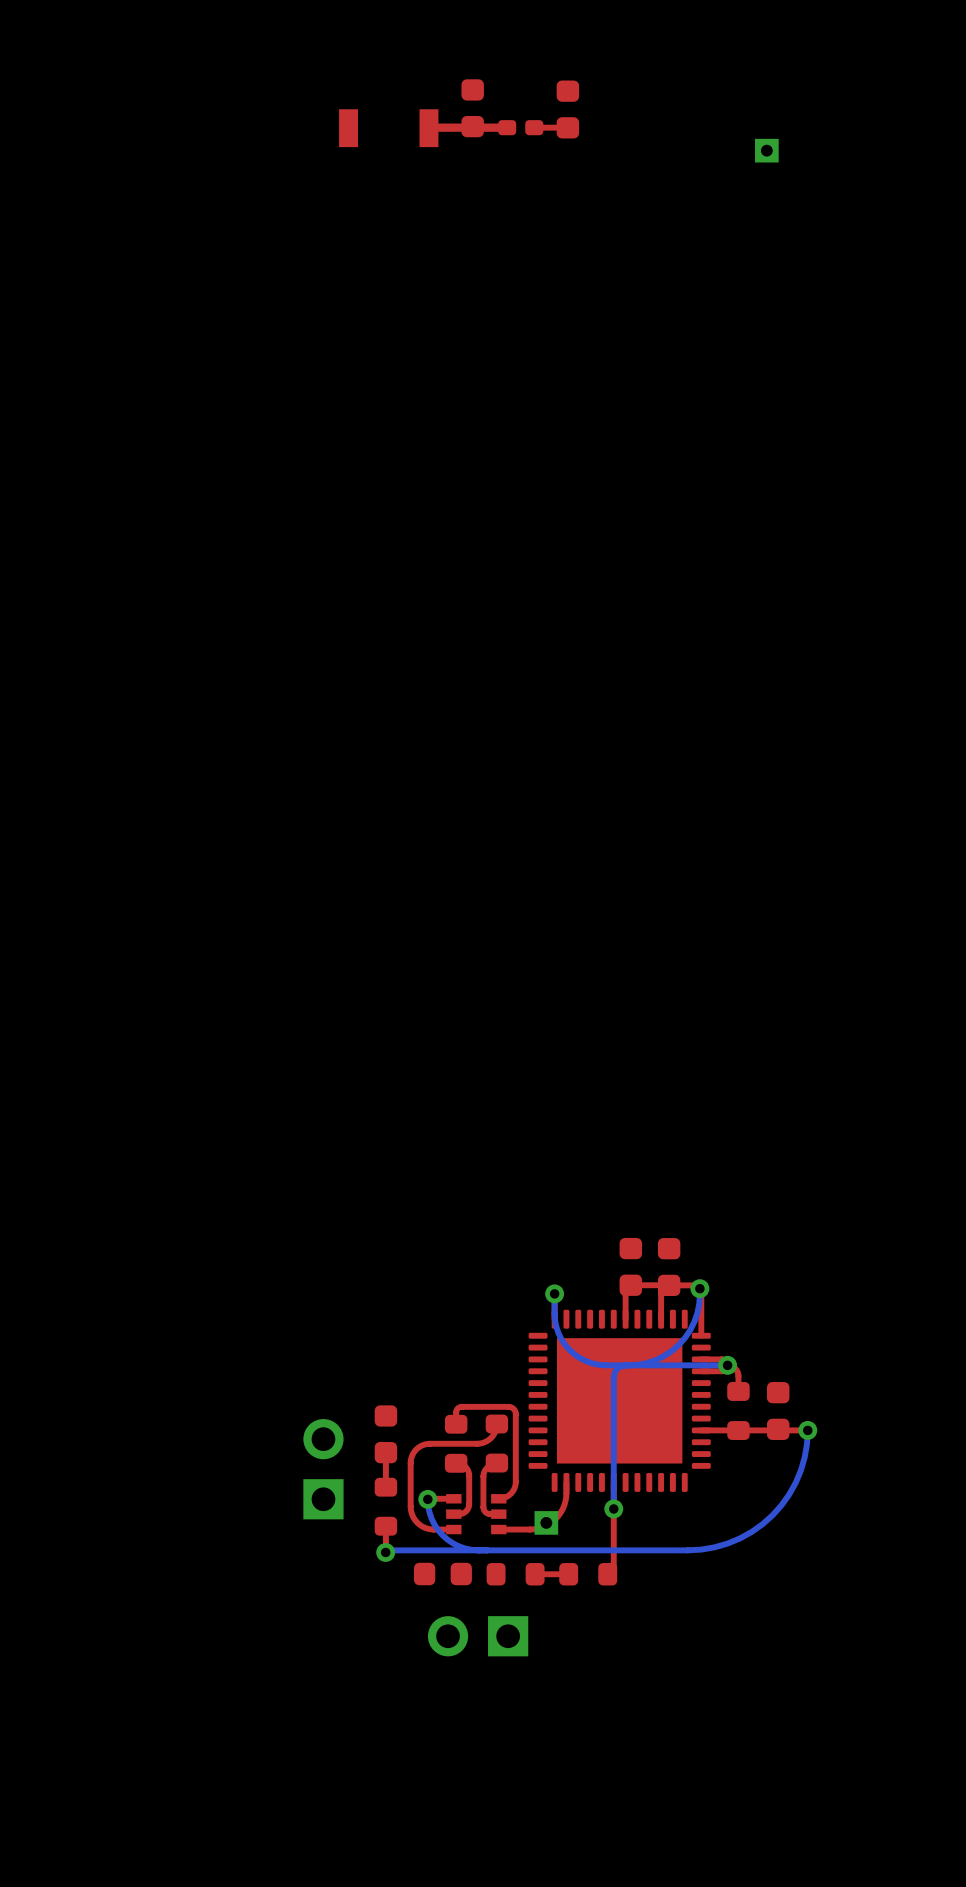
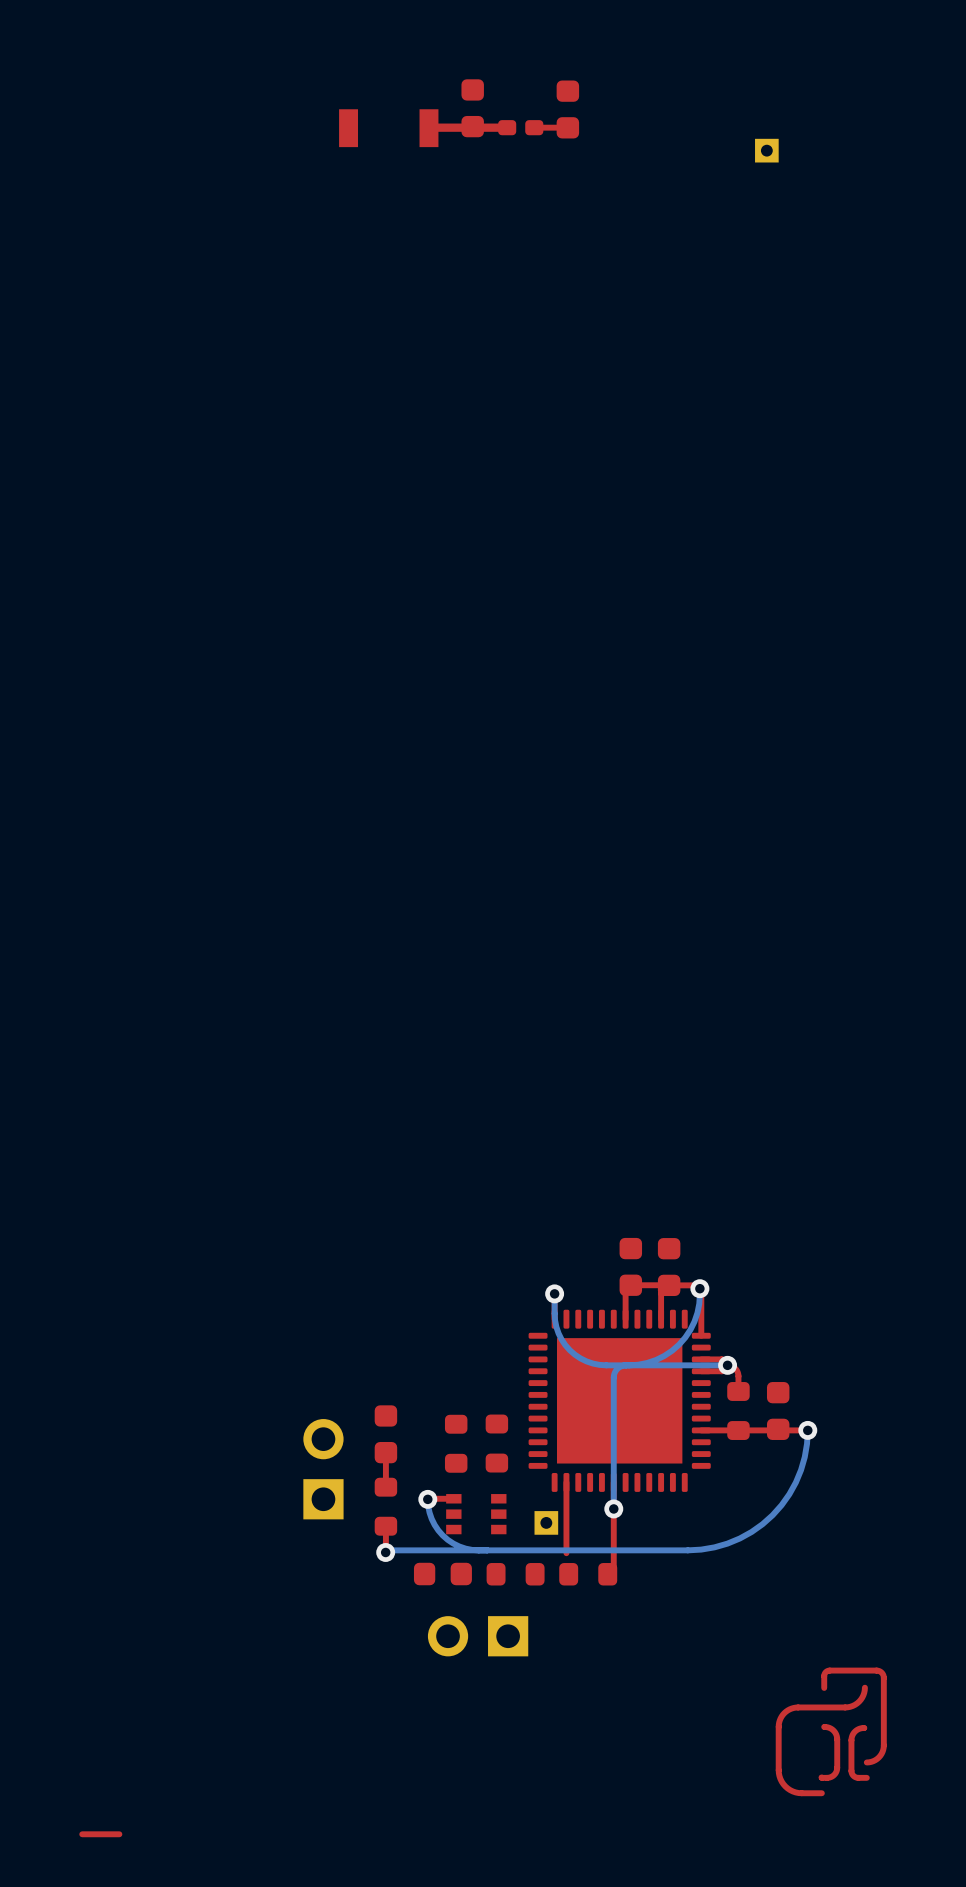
top track: (456, 1424) (456, 1410) (460, 1407) (509, 1406) (514, 1410) (515, 1483) (510, 1493) (498, 1498) -> (824, 1687) (824, 1674) (828, 1670) (877, 1670) (882, 1673) (883, 1747) (877, 1758) (866, 1762)
top track: (496, 1424) (492, 1436) (484, 1442) (425, 1444) (417, 1448) (411, 1456) (410, 1506) (413, 1518) (419, 1524) (427, 1528) (453, 1529) -> (864, 1687) (860, 1699) (852, 1705) (793, 1707) (785, 1711) (779, 1720) (778, 1770) (781, 1781) (787, 1788) (795, 1792) (821, 1793)
top track: (456, 1463) (464, 1465) (468, 1472) (469, 1503) (464, 1512) (453, 1513) -> (824, 1726) (832, 1729) (836, 1736) (837, 1767) (832, 1776) (821, 1777)
top track: (496, 1464) (489, 1466) (484, 1472) (483, 1507) (487, 1513) (498, 1514) -> (864, 1728) (857, 1729) (852, 1736) (851, 1770) (855, 1777) (866, 1777)
top track: (566, 1493) (560, 1512) (545, 1525) (534, 1529) (498, 1529) -> (566, 1493) (566, 1553)
top track: (568, 1574) (535, 1574) -> none
top track: none -> (119, 1834) (82, 1834)

